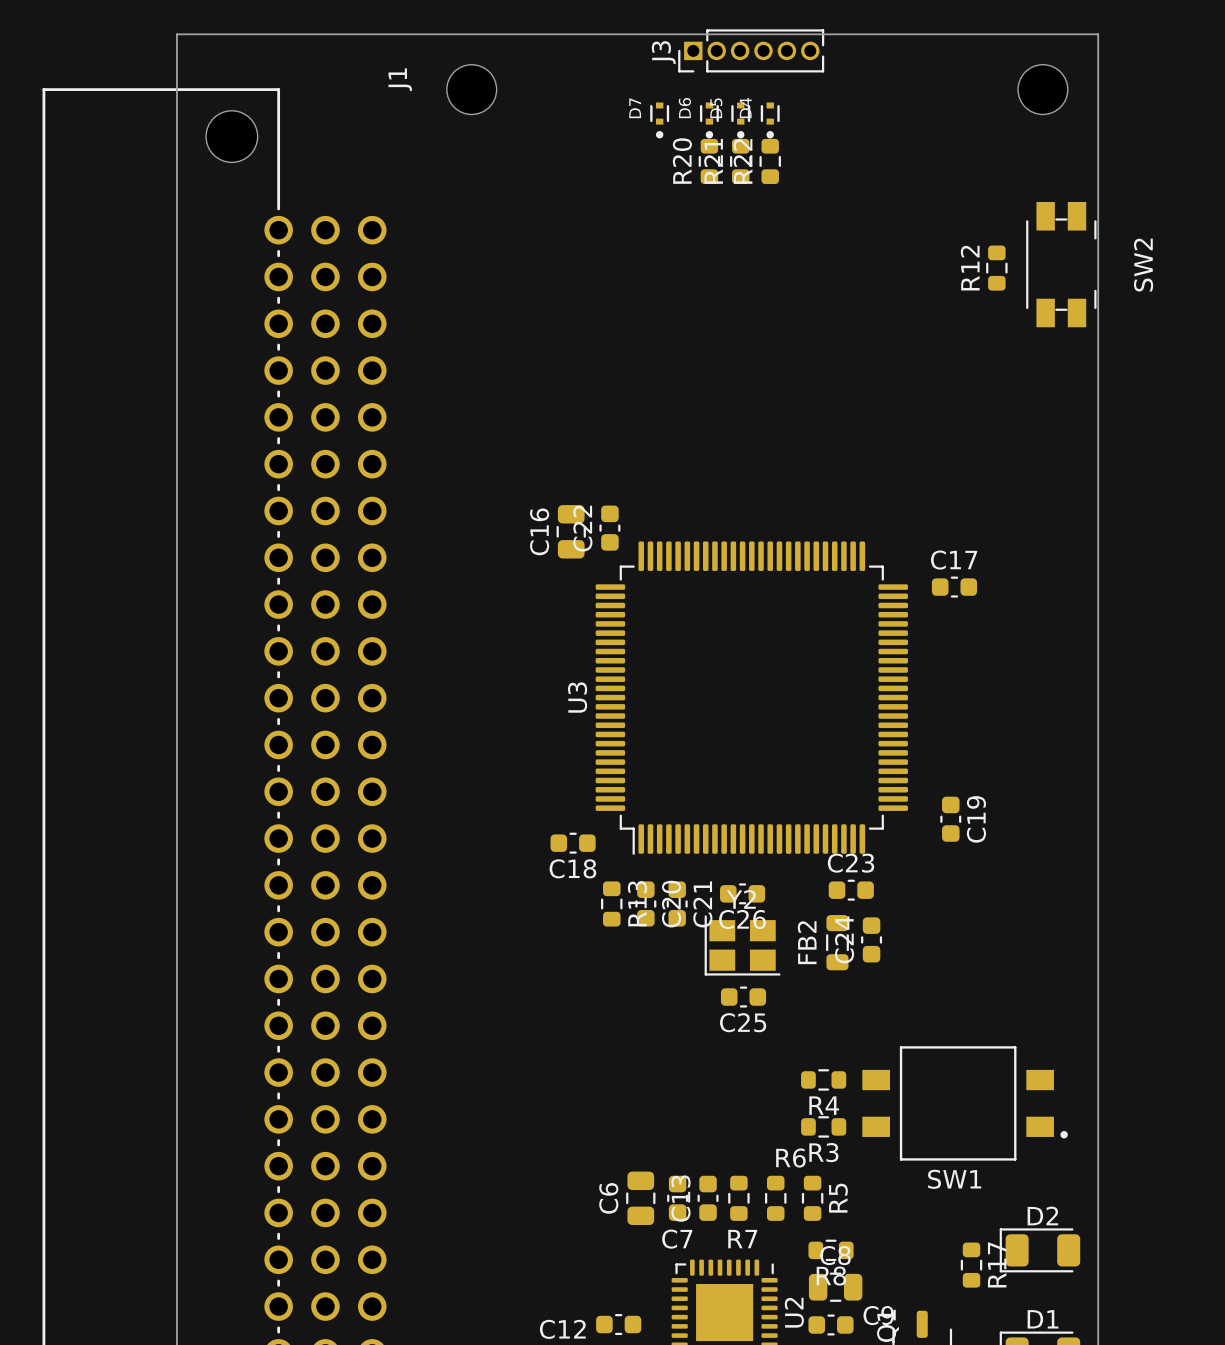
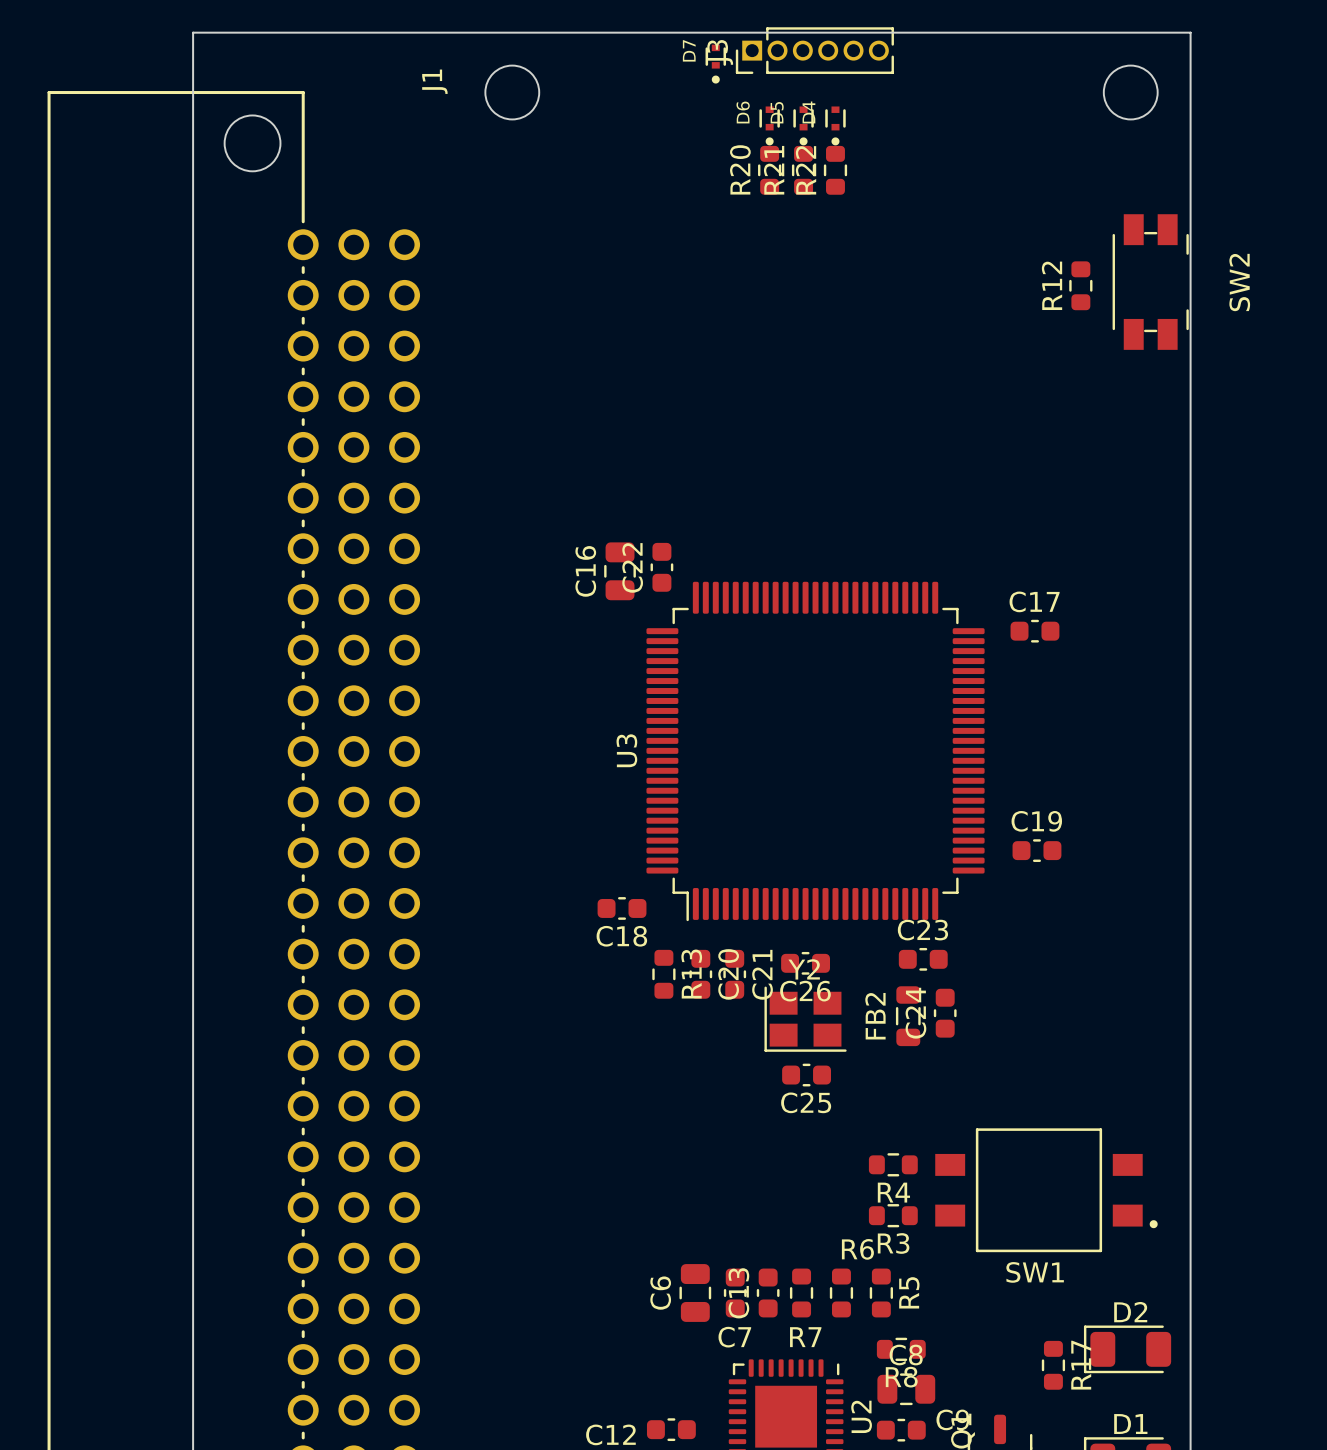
D7 position: (659, 120) -> (715, 64)
C19 rotation: 0° (950, 819) -> 90° clockwise (1036, 850)
C19 position: (950, 819) -> (1036, 850)
C19 name position: C19 (976, 819) -> C19 (1036, 821)

